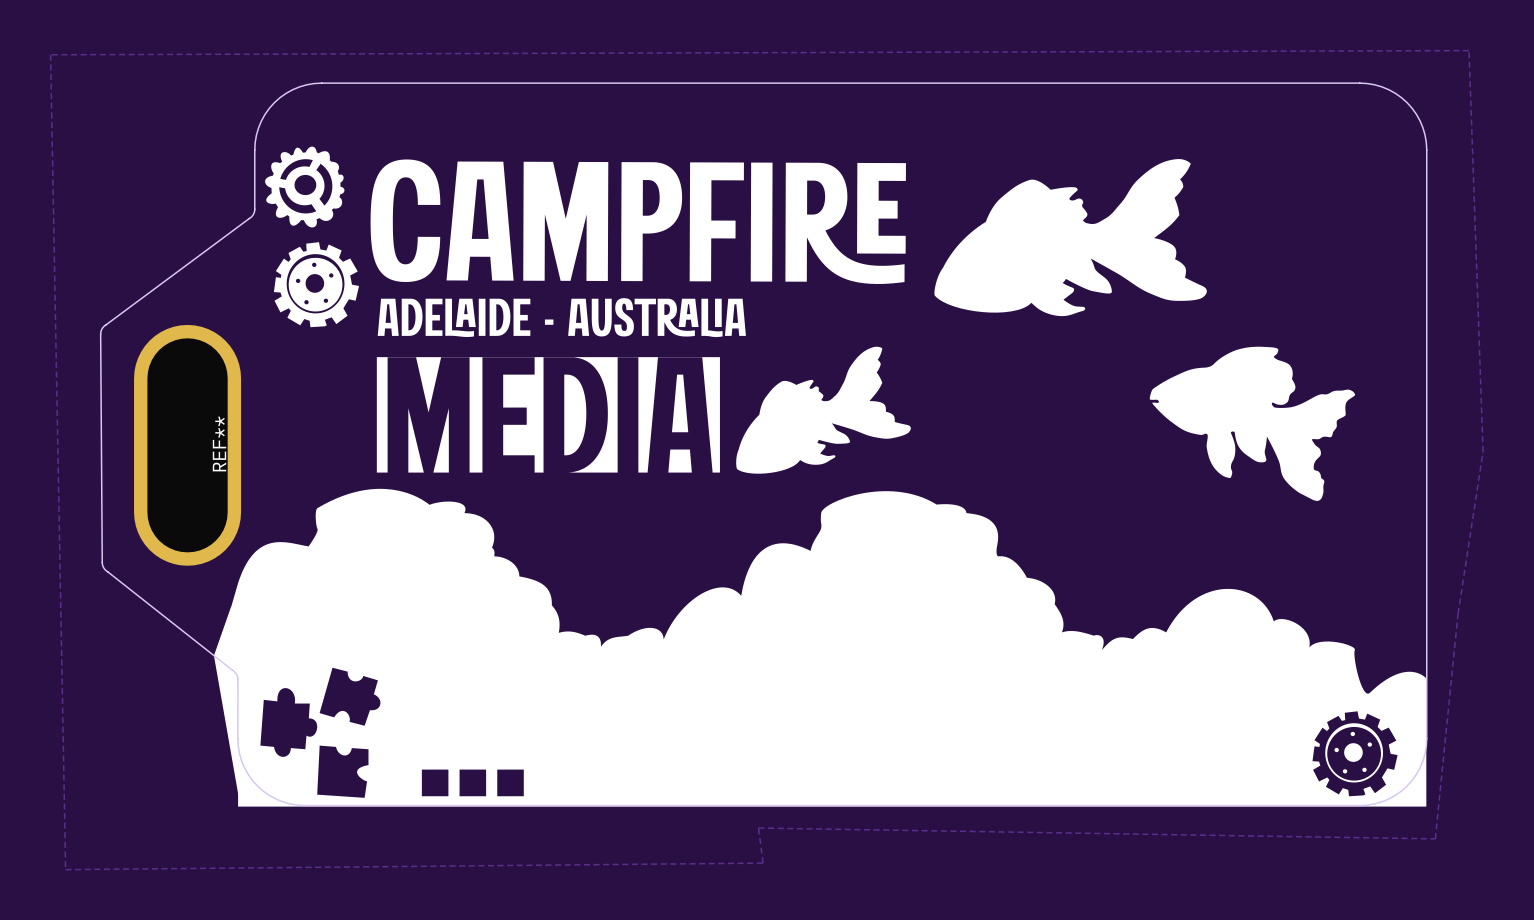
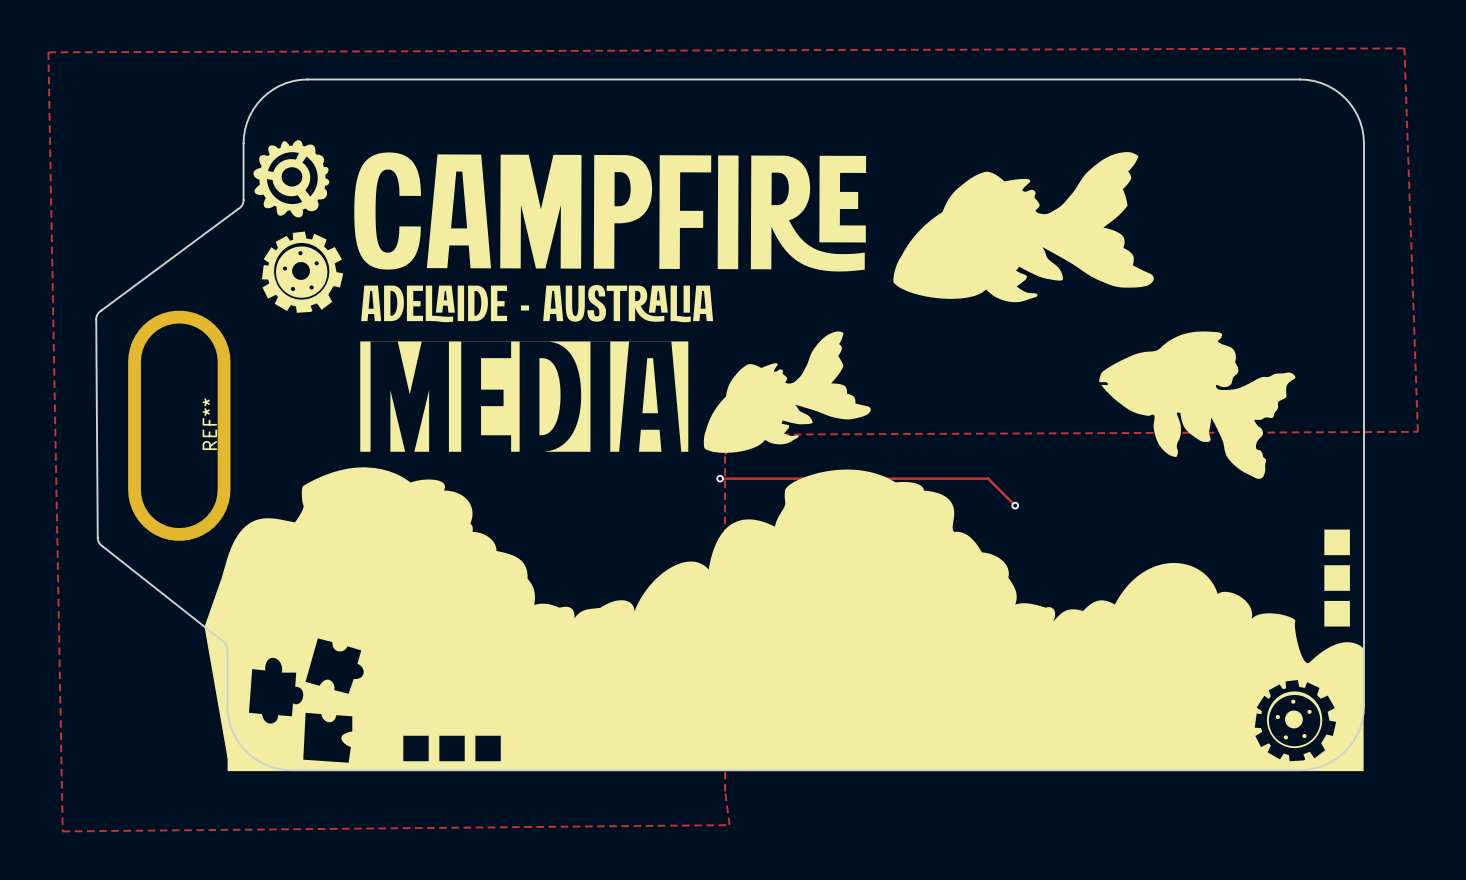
zone outline: (1483, 451) (1458, 613) (1435, 838) (758, 828) -> (1417, 431) (745, 434) (724, 454) (725, 791)
track: none -> (720, 478) (988, 478) (1015, 505)
via: none -> (720, 478)
via: none -> (1015, 505)
drawing: none -> [1324, 529, 1350, 627]

